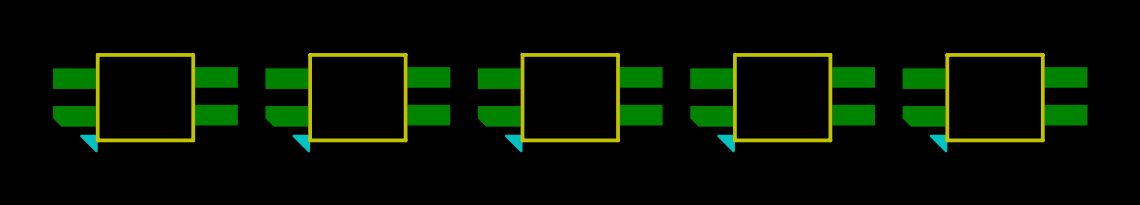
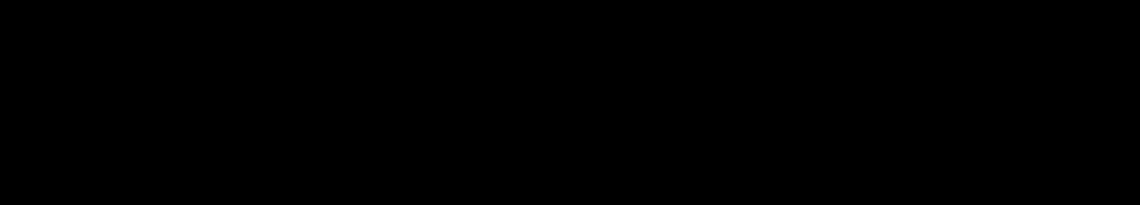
part: (145, 102) -> none
part: (357, 102) -> none
part: (570, 102) -> none
part: (782, 102) -> none
part: (995, 102) -> none

